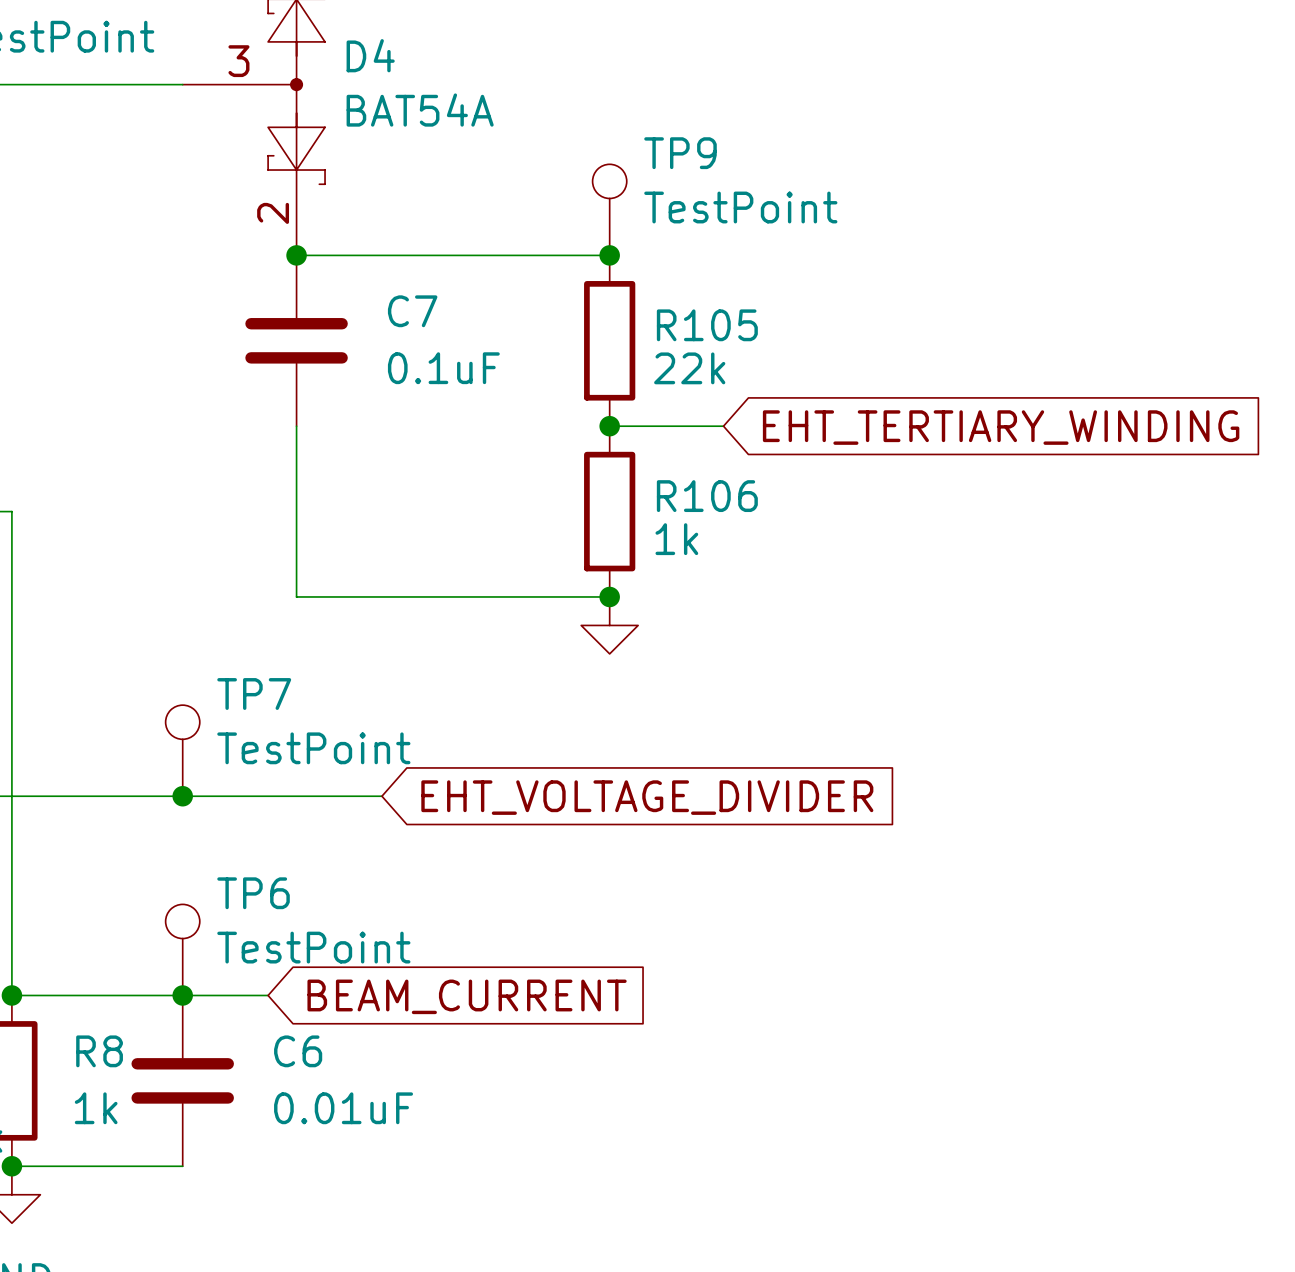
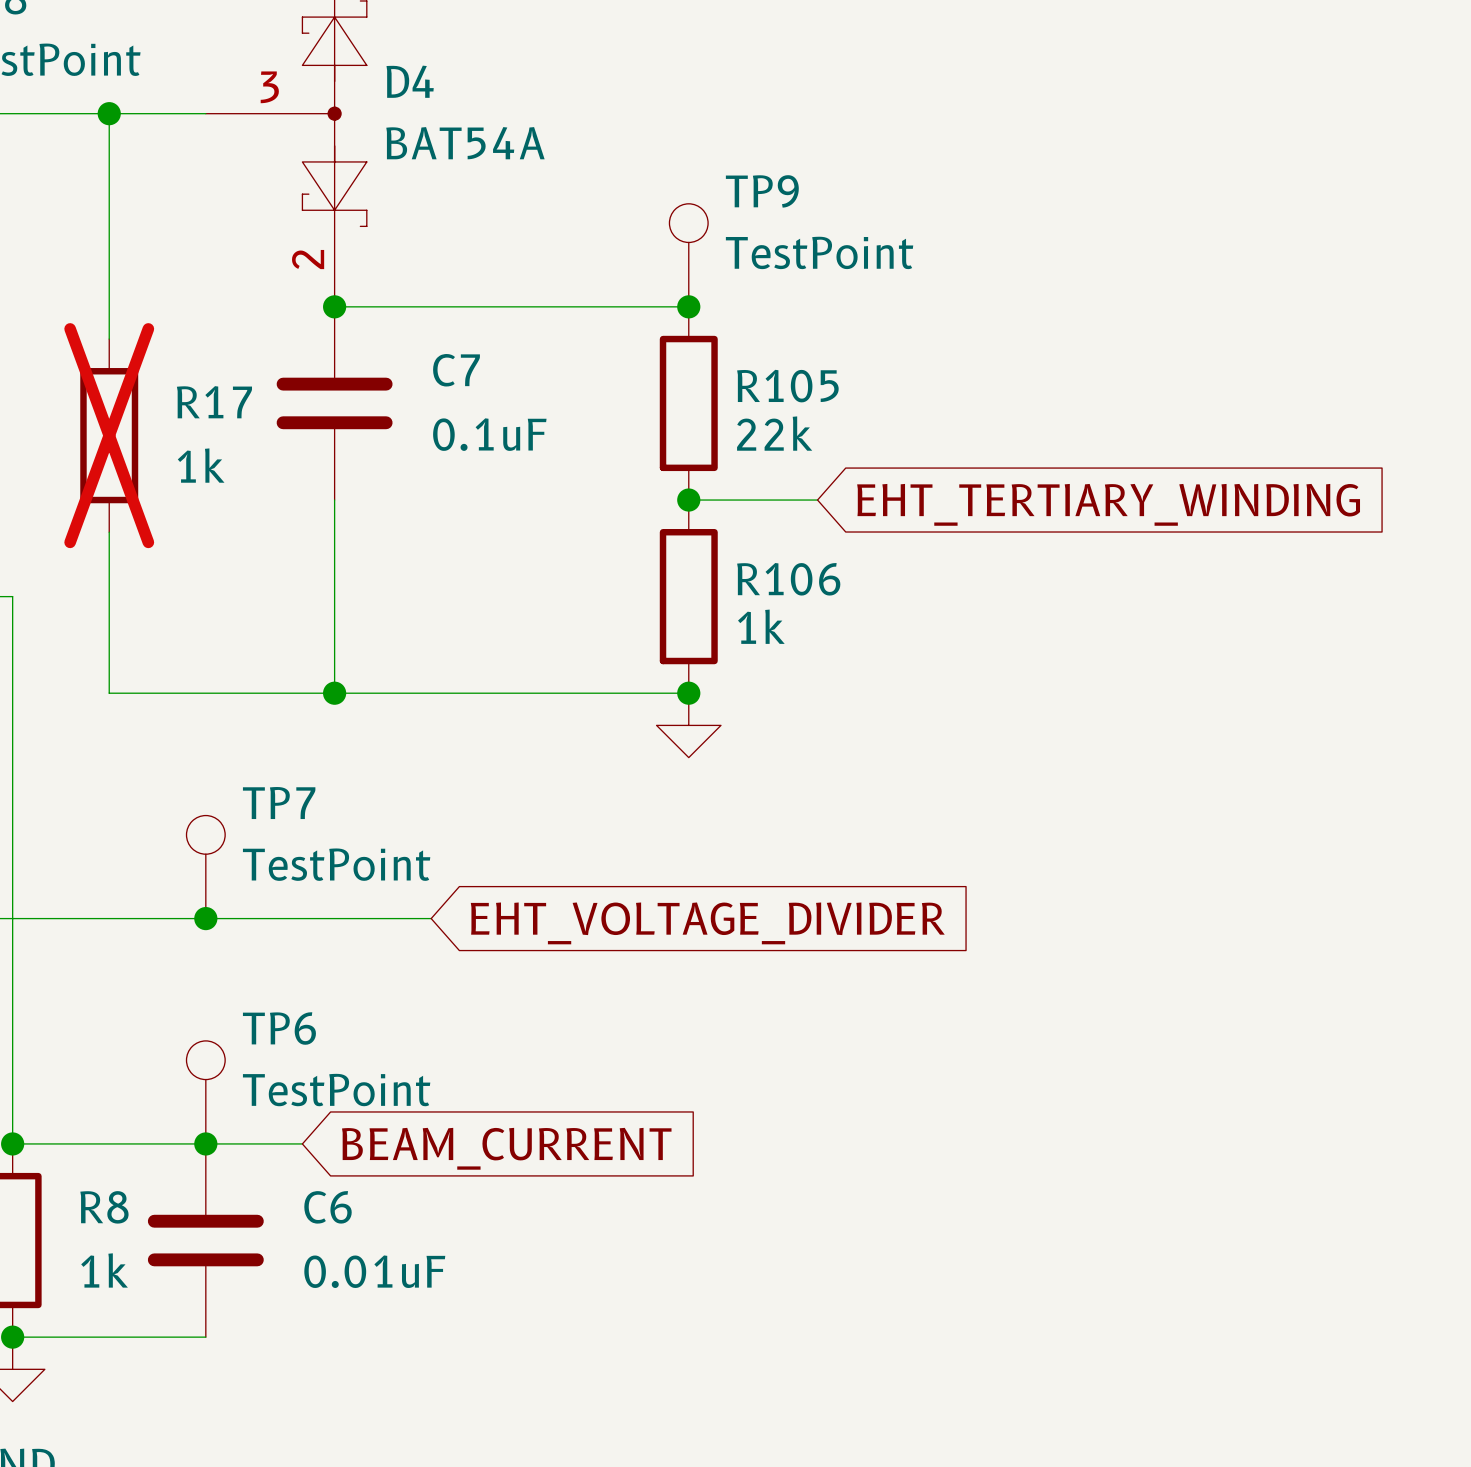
wire: none -> (109, 113) (109, 339)
junction: none -> (109, 113)
R17: none -> 1k (109, 435)
wire: none -> (109, 532) (109, 693) (334, 693)
junction: none -> (334, 693)

